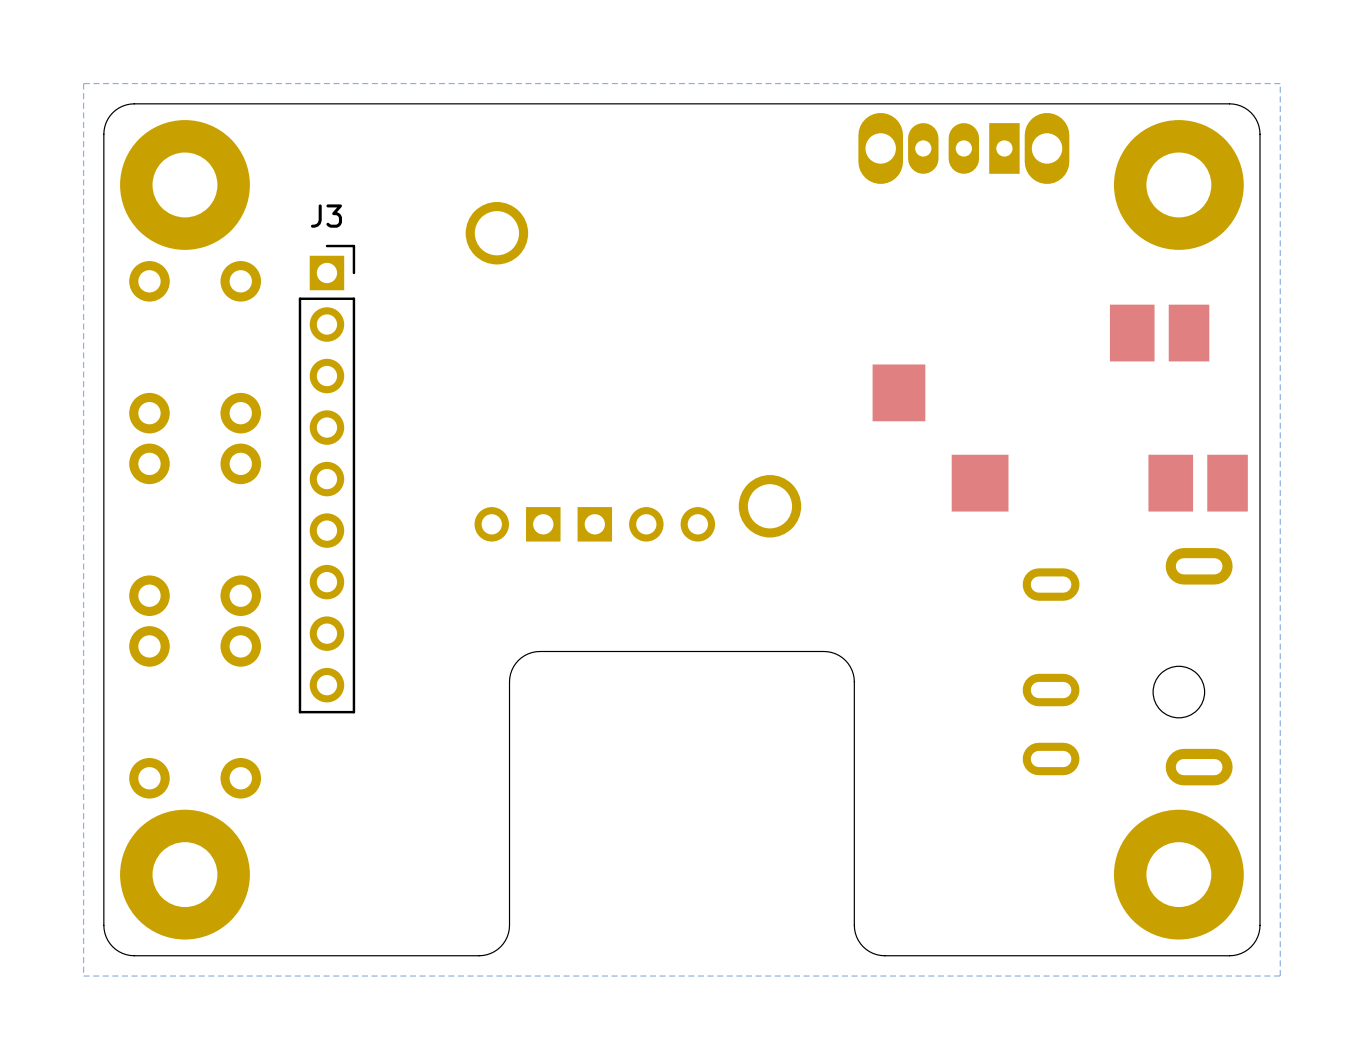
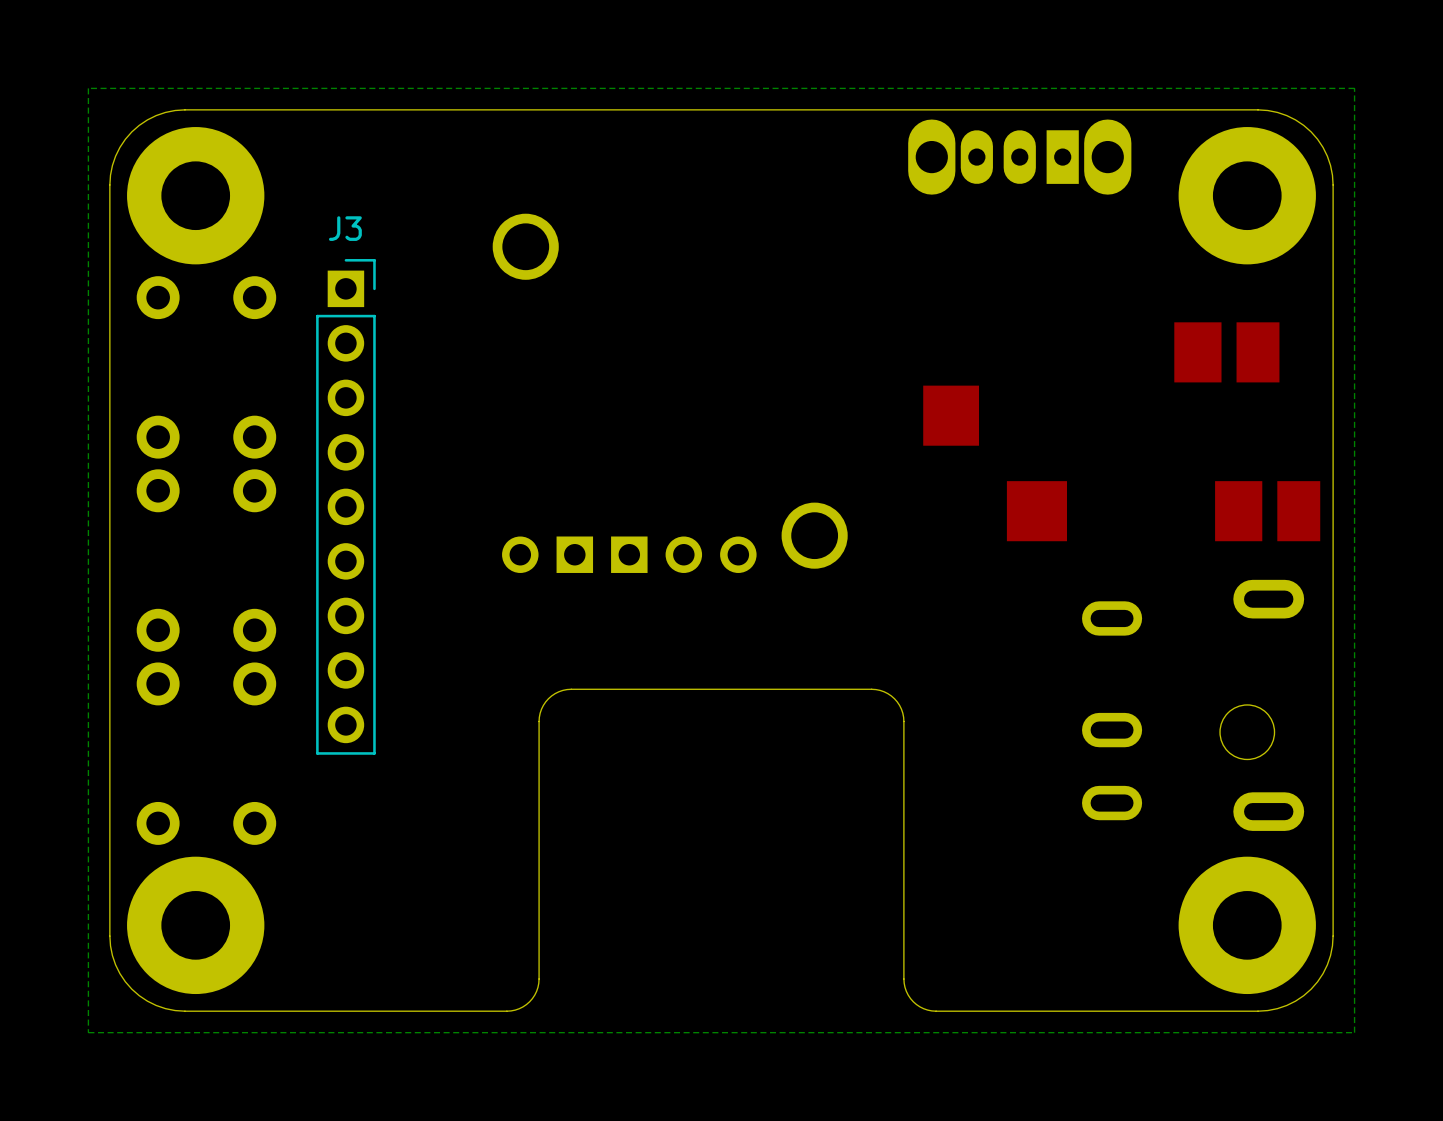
board edge: (174, 103) (130, 104) (122, 106) (112, 112) (106, 122) (104, 130) (103, 174) -> (184, 109) (156, 115) (131, 131) (115, 156) (109, 184)
board edge: (1189, 103) (1233, 104) (1244, 107) (1251, 112) (1255, 119) (1259, 130) (1260, 174) -> (1257, 109) (1286, 115) (1311, 131) (1327, 156) (1333, 184)
board edge: (103, 884) (104, 929) (106, 936) (112, 946) (122, 953) (130, 955) (174, 955) -> (109, 936) (115, 964) (131, 989) (156, 1005) (184, 1011)
board edge: (1260, 884) (1259, 929) (1255, 940) (1251, 946) (1244, 951) (1233, 955) (1189, 955) -> (1333, 936) (1327, 964) (1311, 989) (1286, 1005) (1257, 1011)

